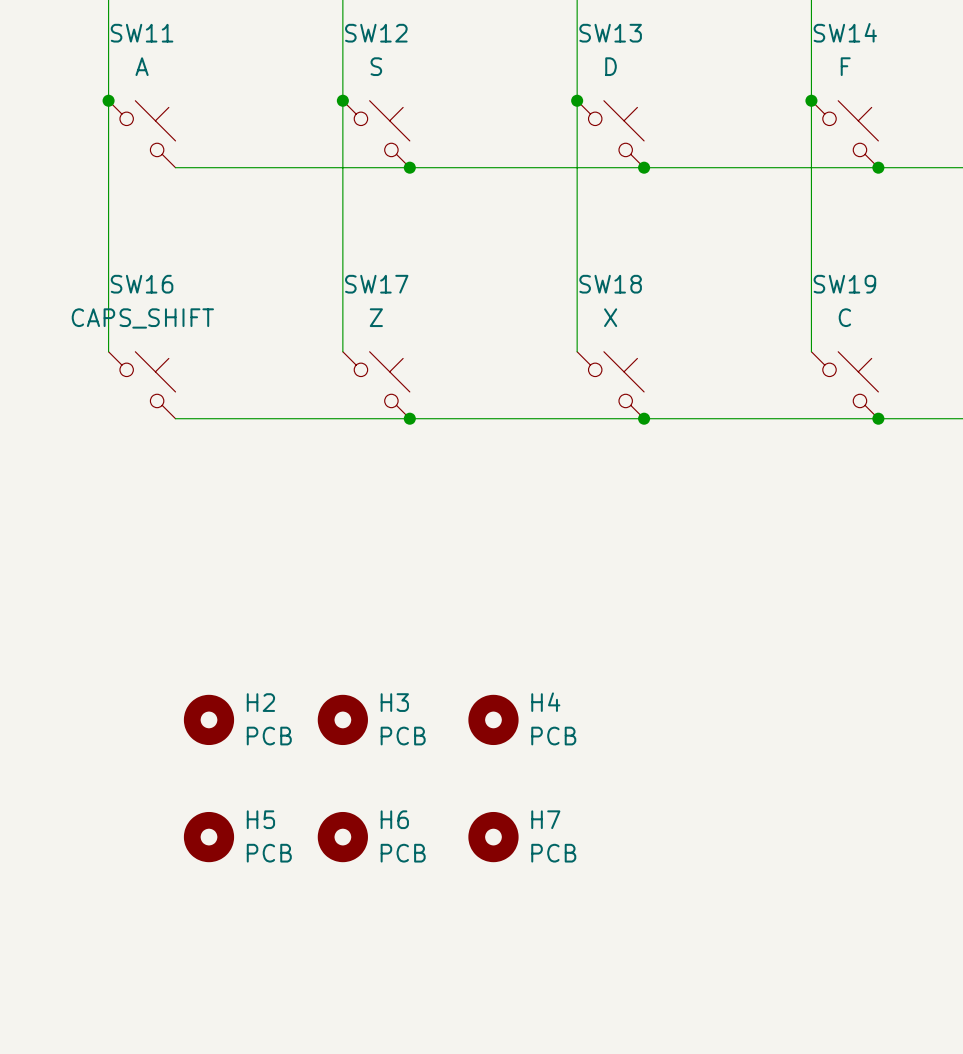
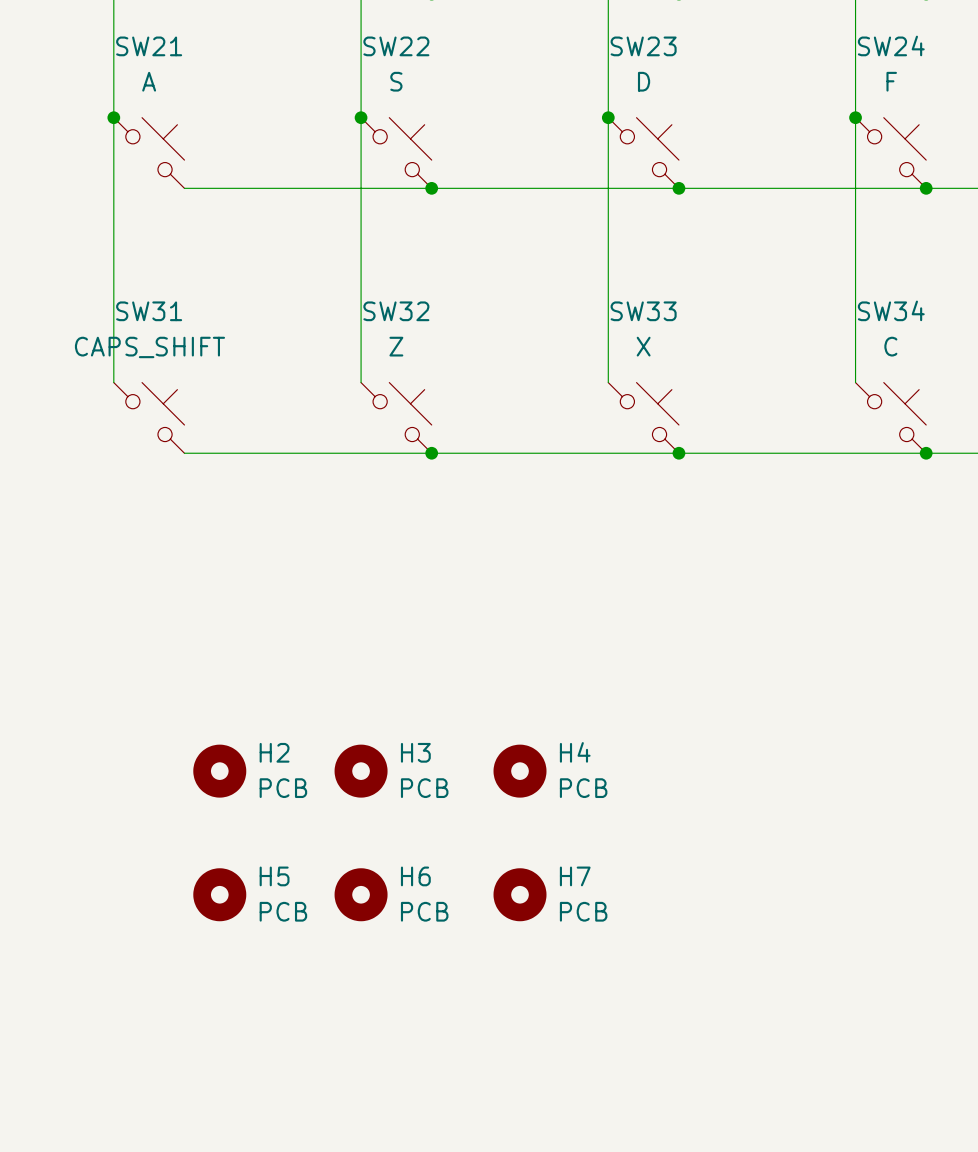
SW14 name: SW14 (845, 32) -> SW24 (891, 45)
SW11 name: SW11 (142, 33) -> SW21 (149, 46)
SW12 name: SW12 (376, 33) -> SW22 (396, 46)
SW13 name: SW13 (610, 33) -> SW23 (643, 46)
SW16 name: SW16 (142, 284) -> SW31 (149, 311)
SW17 name: SW17 (376, 284) -> SW32 (396, 311)
SW18 name: SW18 (610, 284) -> SW33 (643, 311)
SW19 name: SW19 (844, 284) -> SW34 (891, 310)

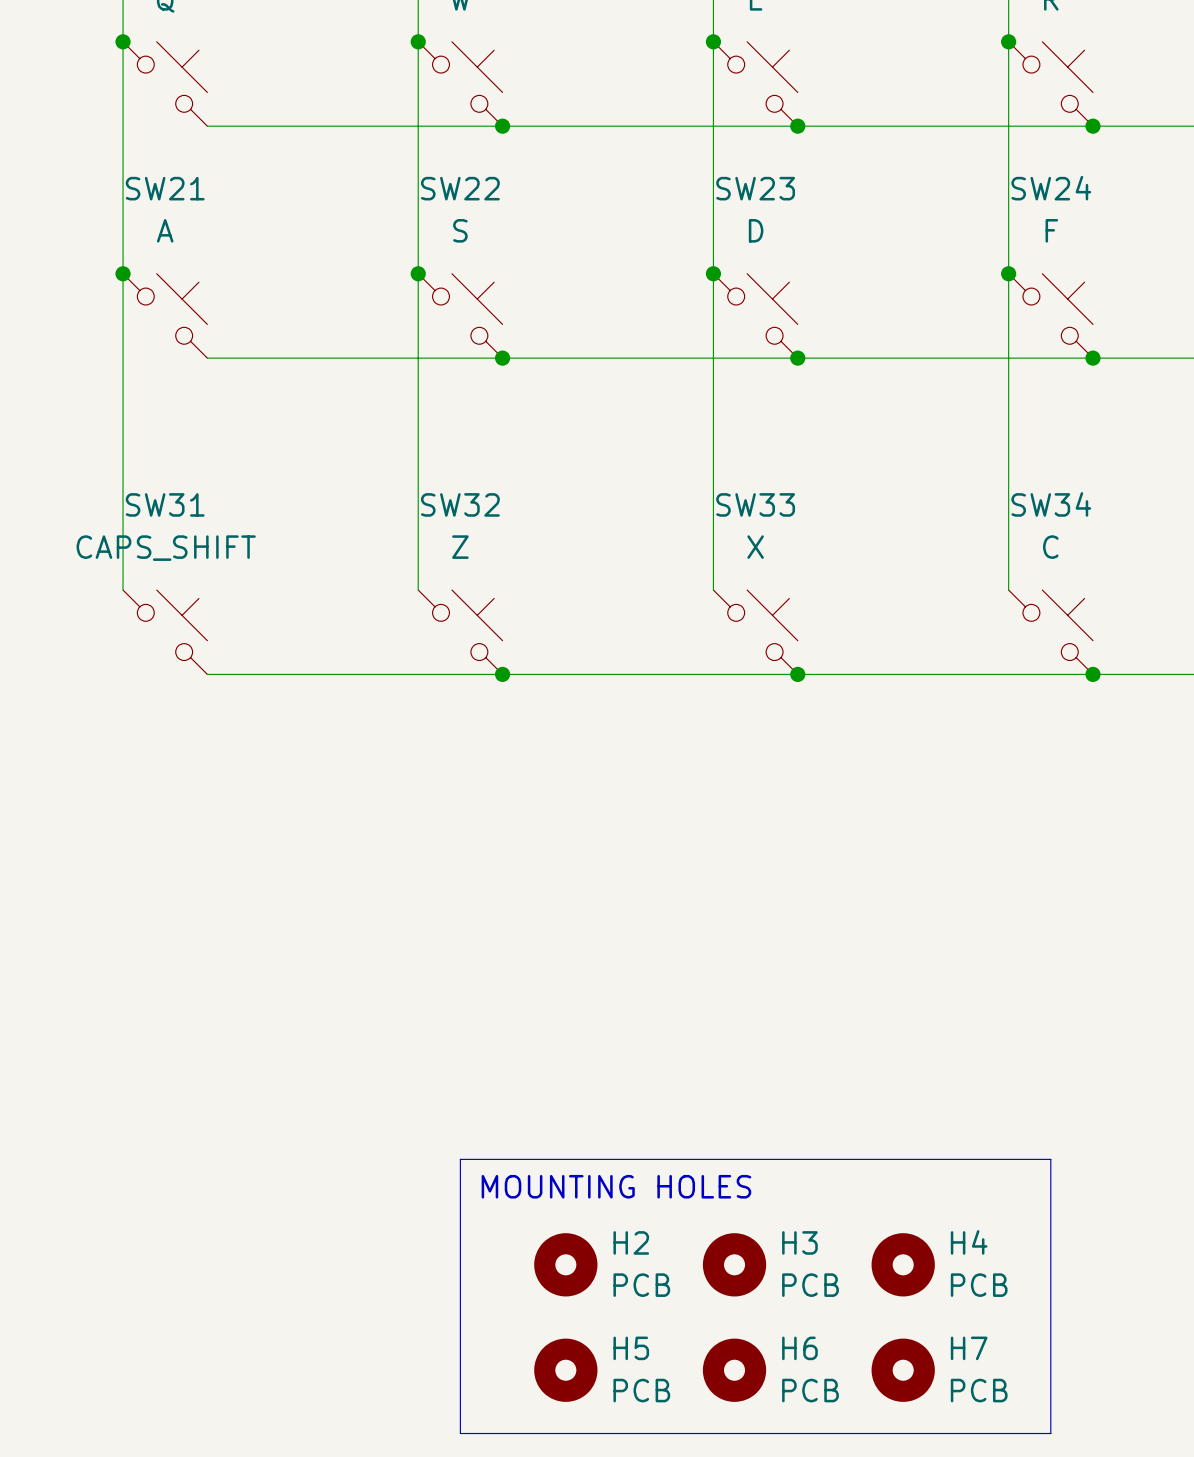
H2 position: (219, 771) -> (565, 1264)
H3 position: (361, 771) -> (734, 1264)
H4 position: (520, 771) -> (903, 1264)
line: none -> (460, 1159) (1050, 1159) (1050, 1433) (460, 1433) (460, 1159)
text: none -> MOUNTING HOLES (616, 1186)
H5 position: (219, 894) -> (565, 1370)
H6 position: (361, 894) -> (734, 1370)
H7 position: (520, 894) -> (903, 1370)

